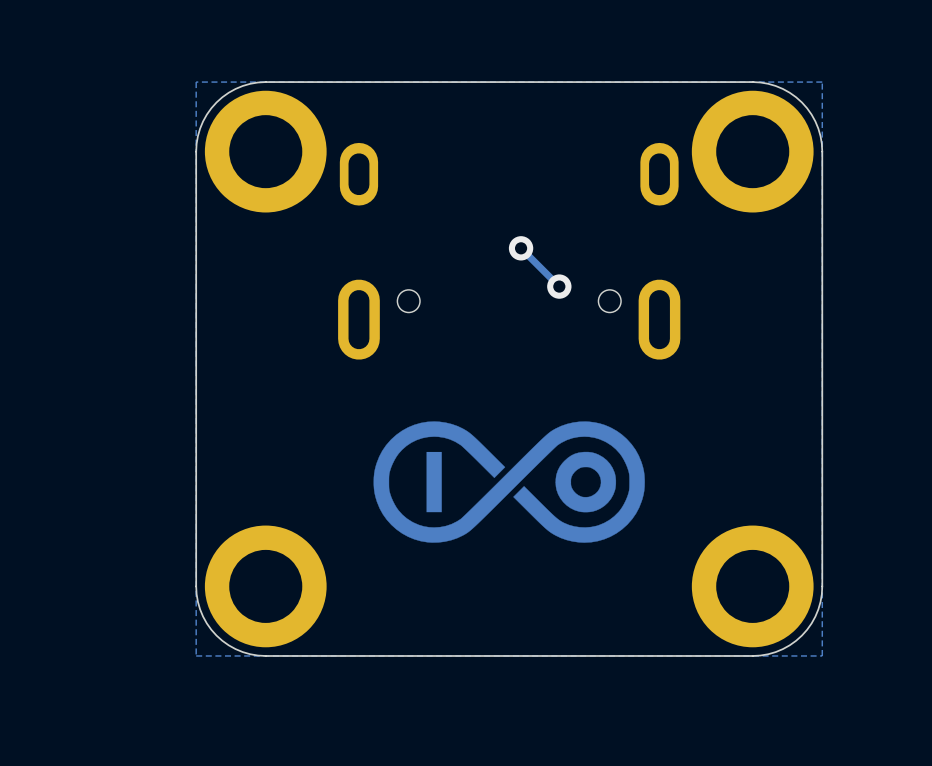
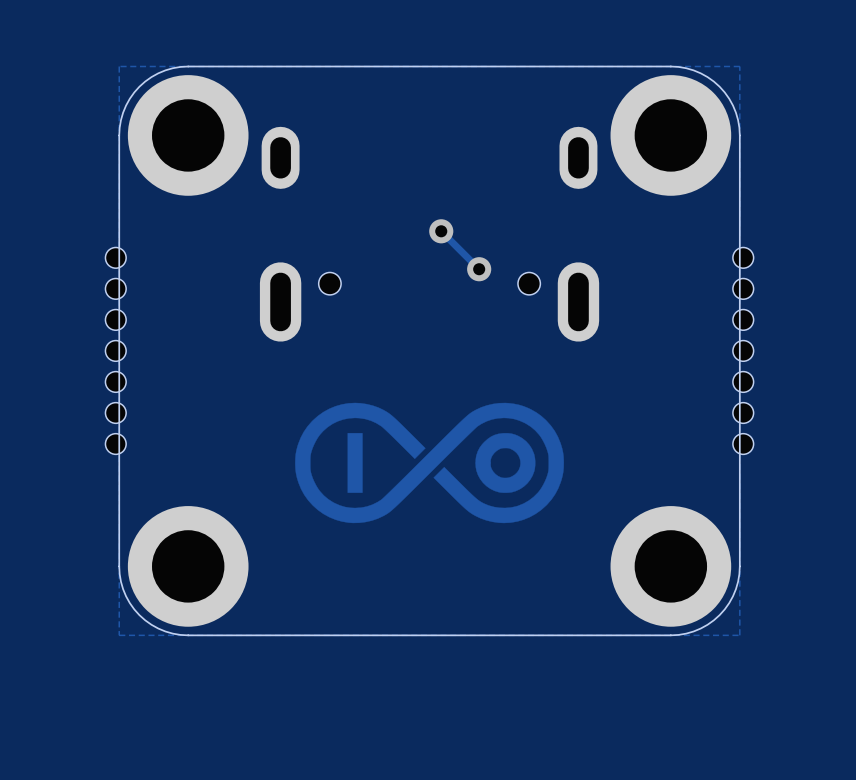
part: none -> (115, 350)
part: none -> (743, 350)

